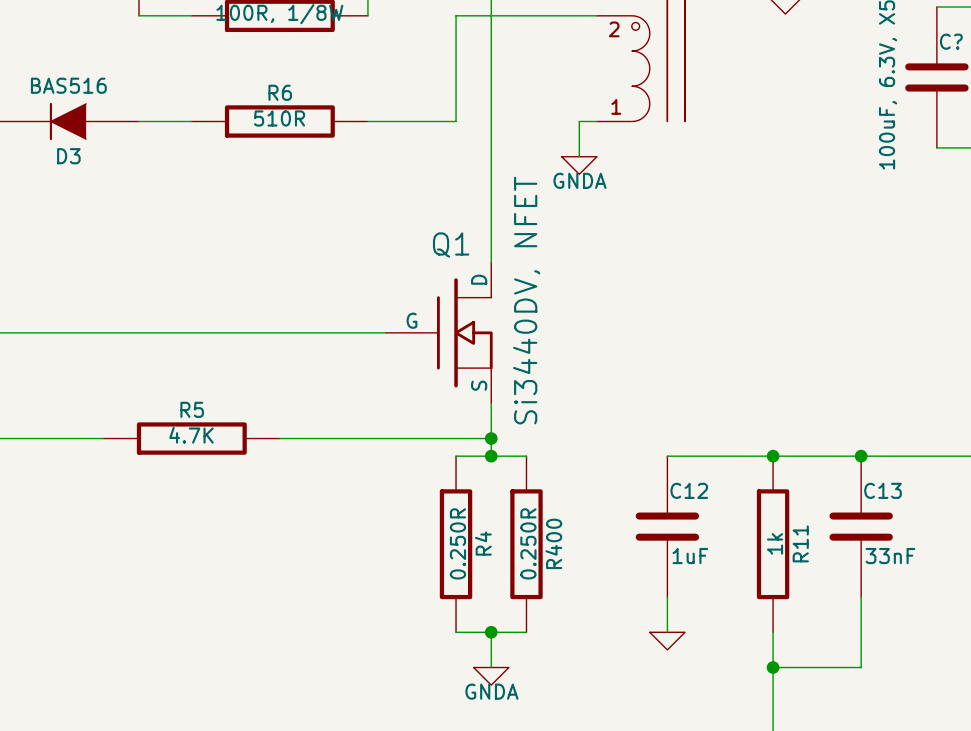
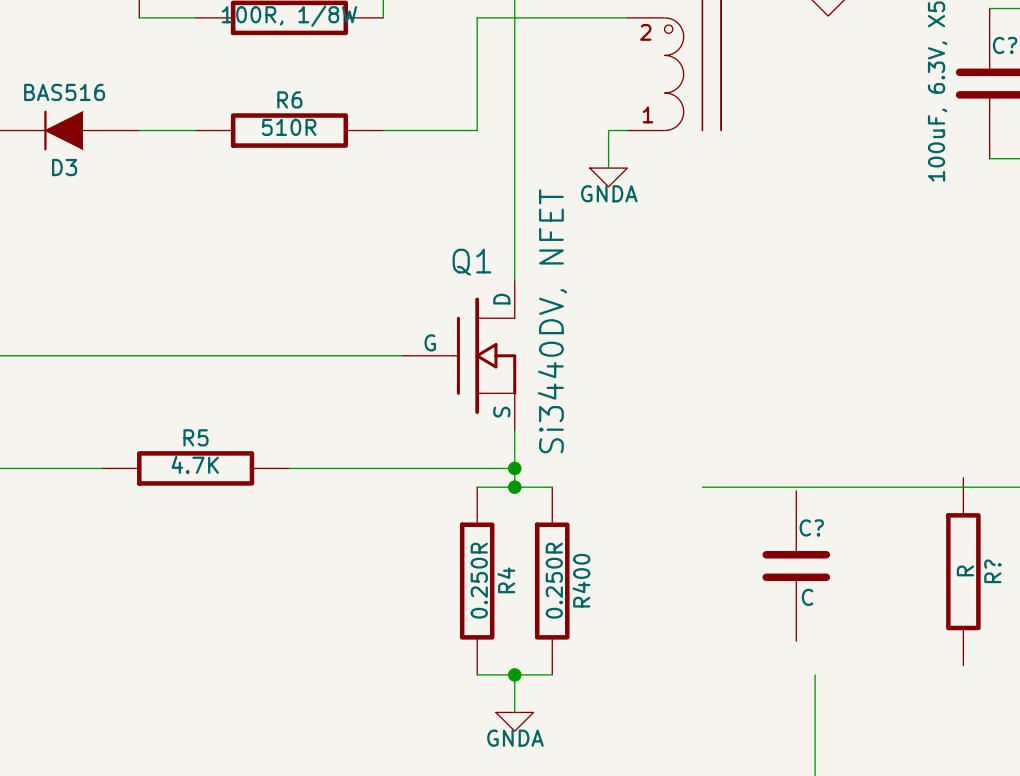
junction: (773, 456) -> none
junction: (861, 456) -> none
C12: 1uF (667, 526) -> none
C13: 33nF (861, 526) -> none
C?: none -> C (796, 566)
R?: none -> R (963, 571)
R11: 1k (773, 544) -> none
wire: (667, 597) (667, 632) -> none
wire: (861, 597) (861, 667) (773, 667) -> none
power symbol: (667, 641) -> none
junction: (773, 667) -> none

